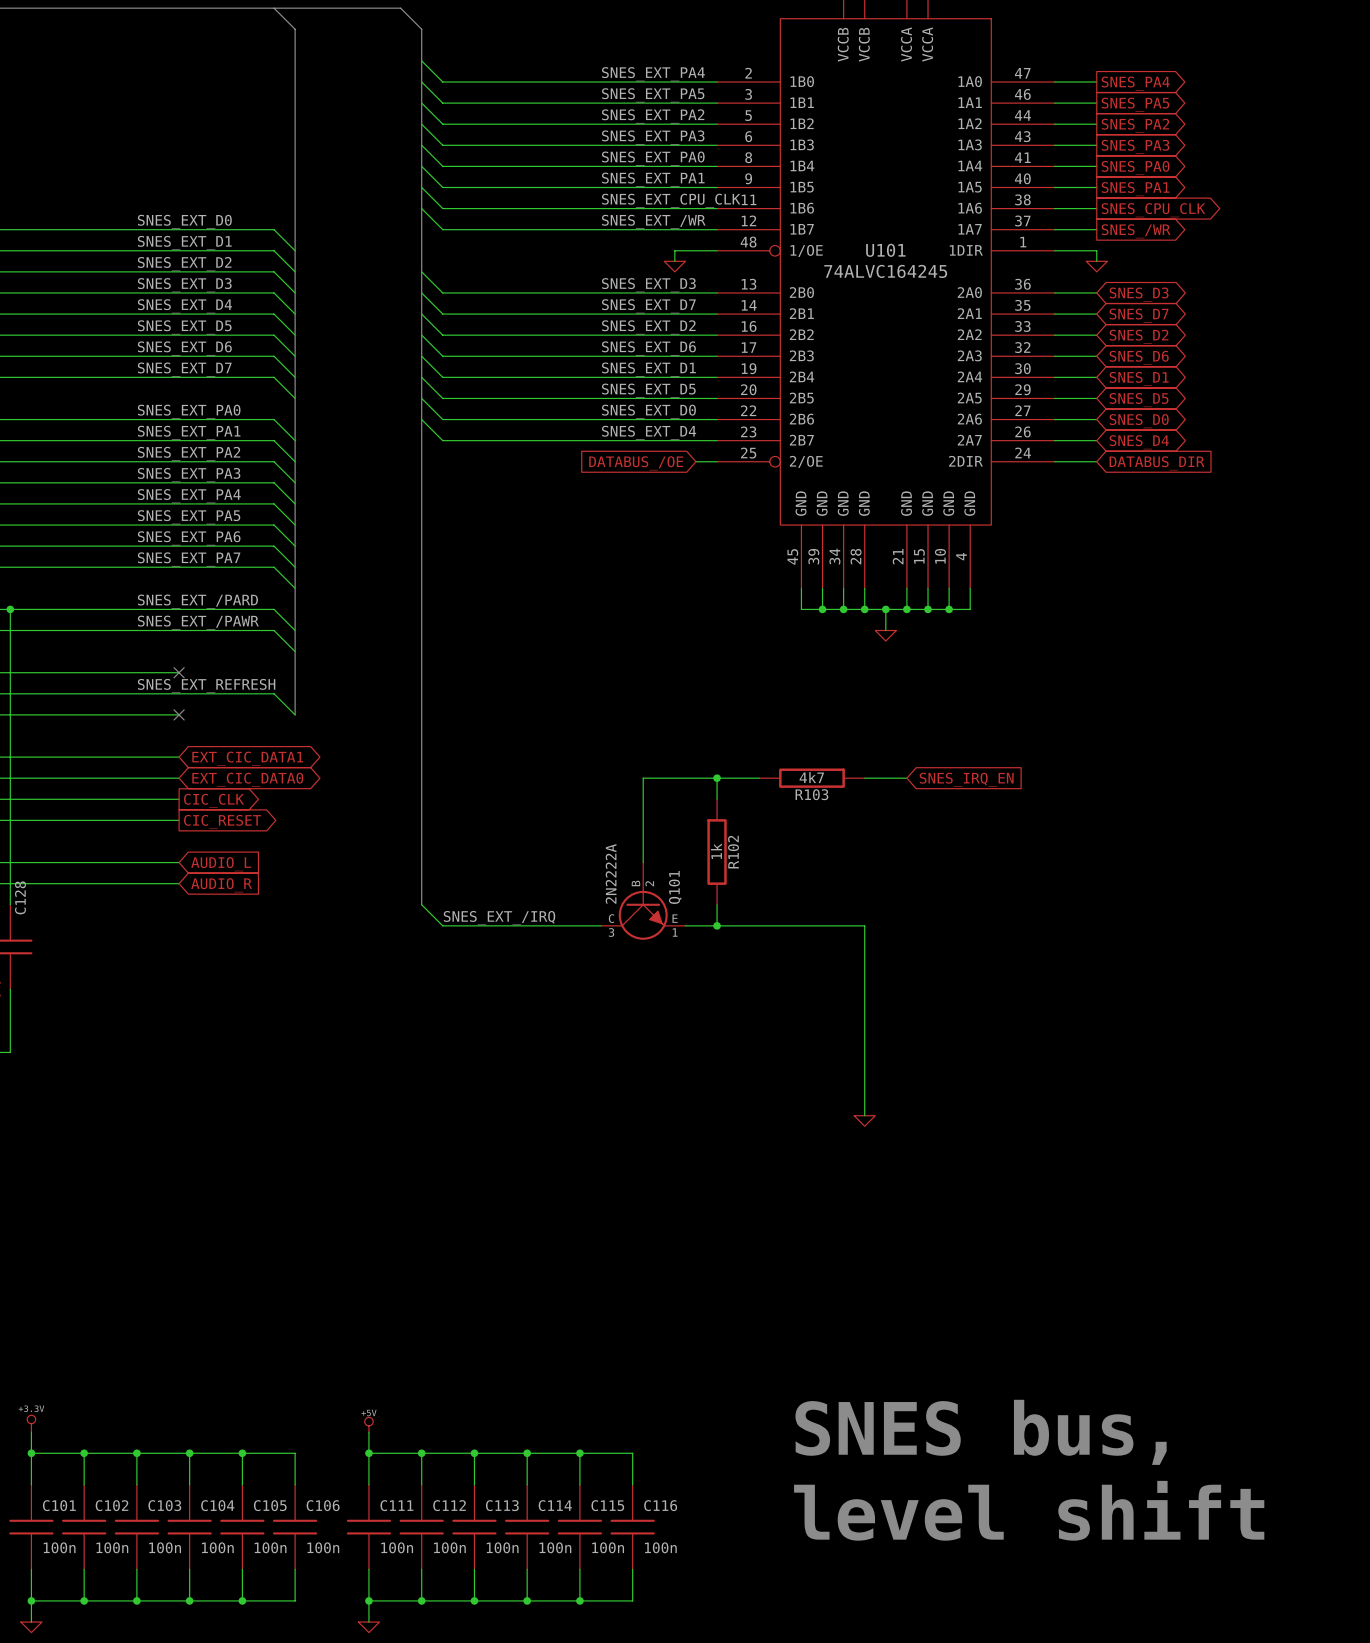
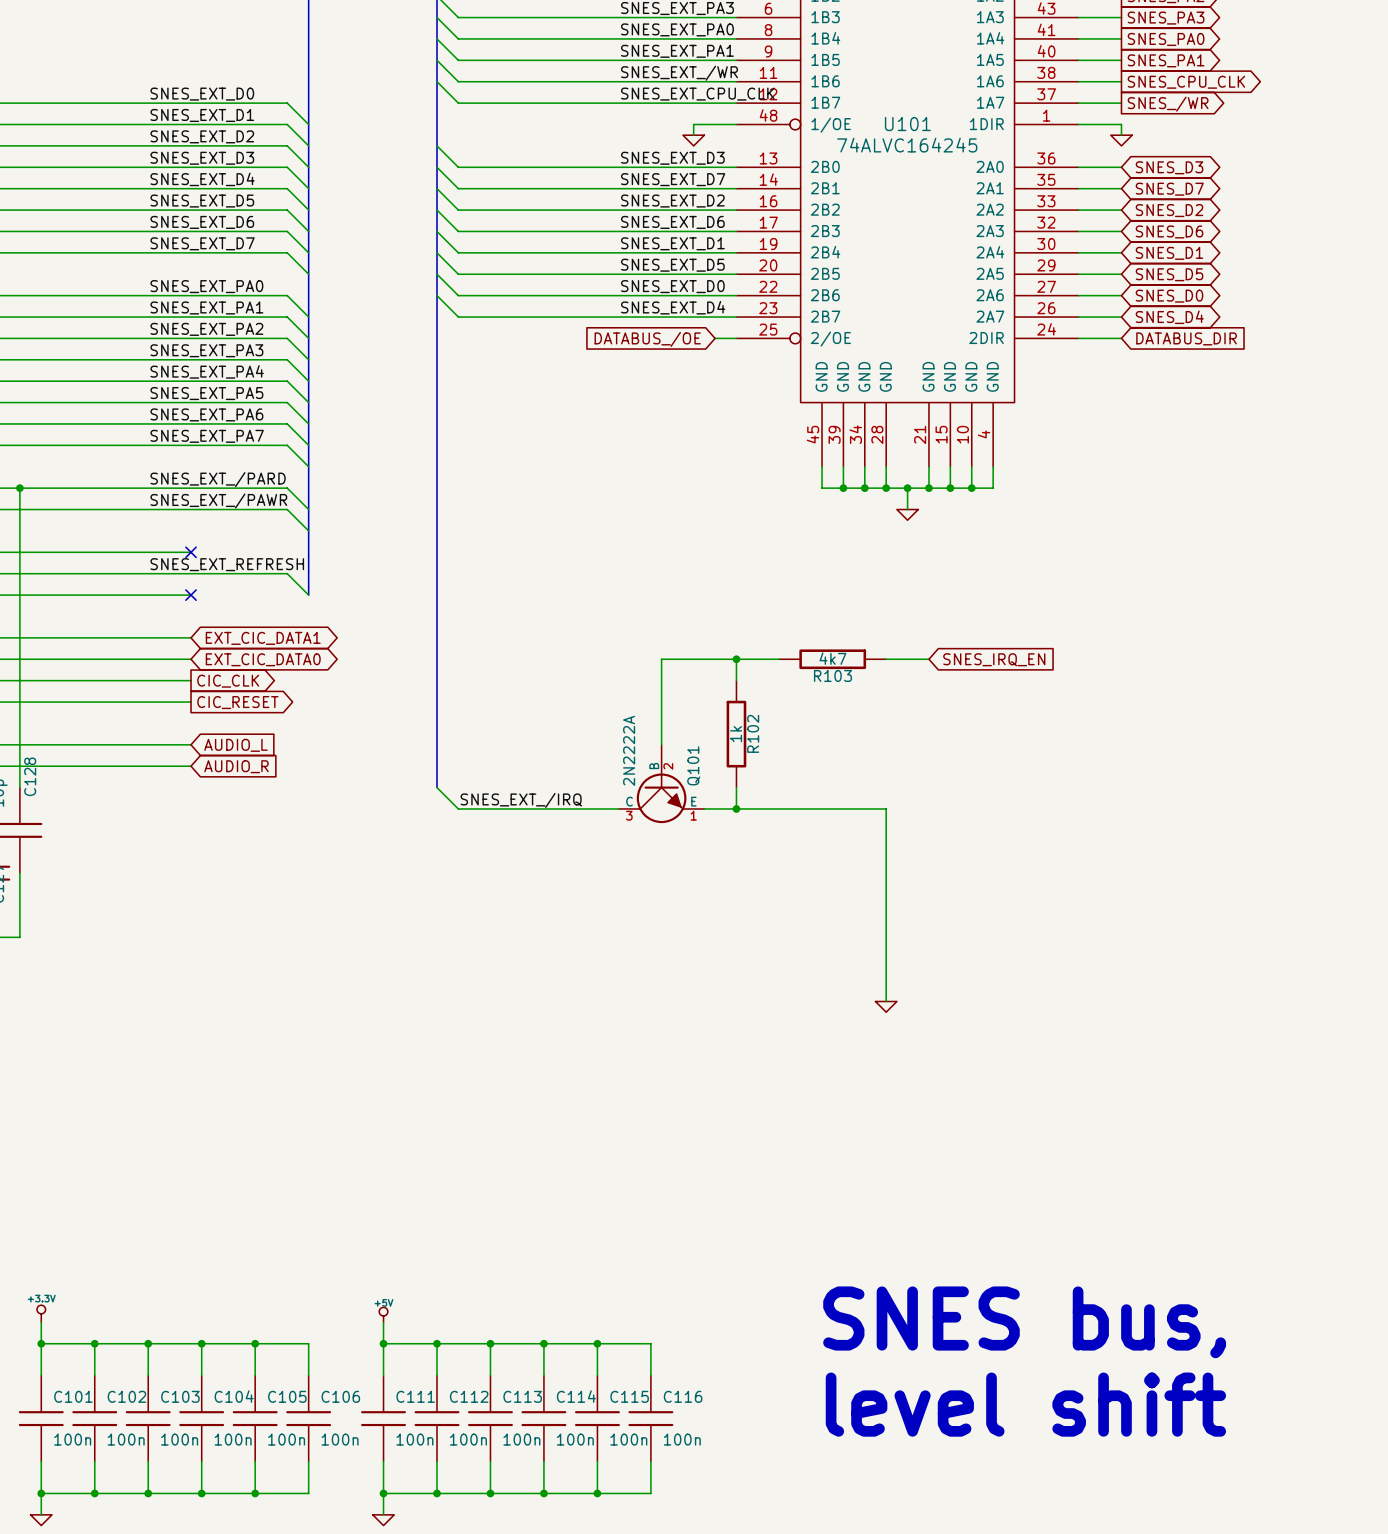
label: SNES_EXT_CPU_CLK (671, 200) -> SNES_EXT_/WR (679, 73)
label: SNES_EXT_/WR (653, 221) -> SNES_EXT_CPU_CLK (697, 94)

